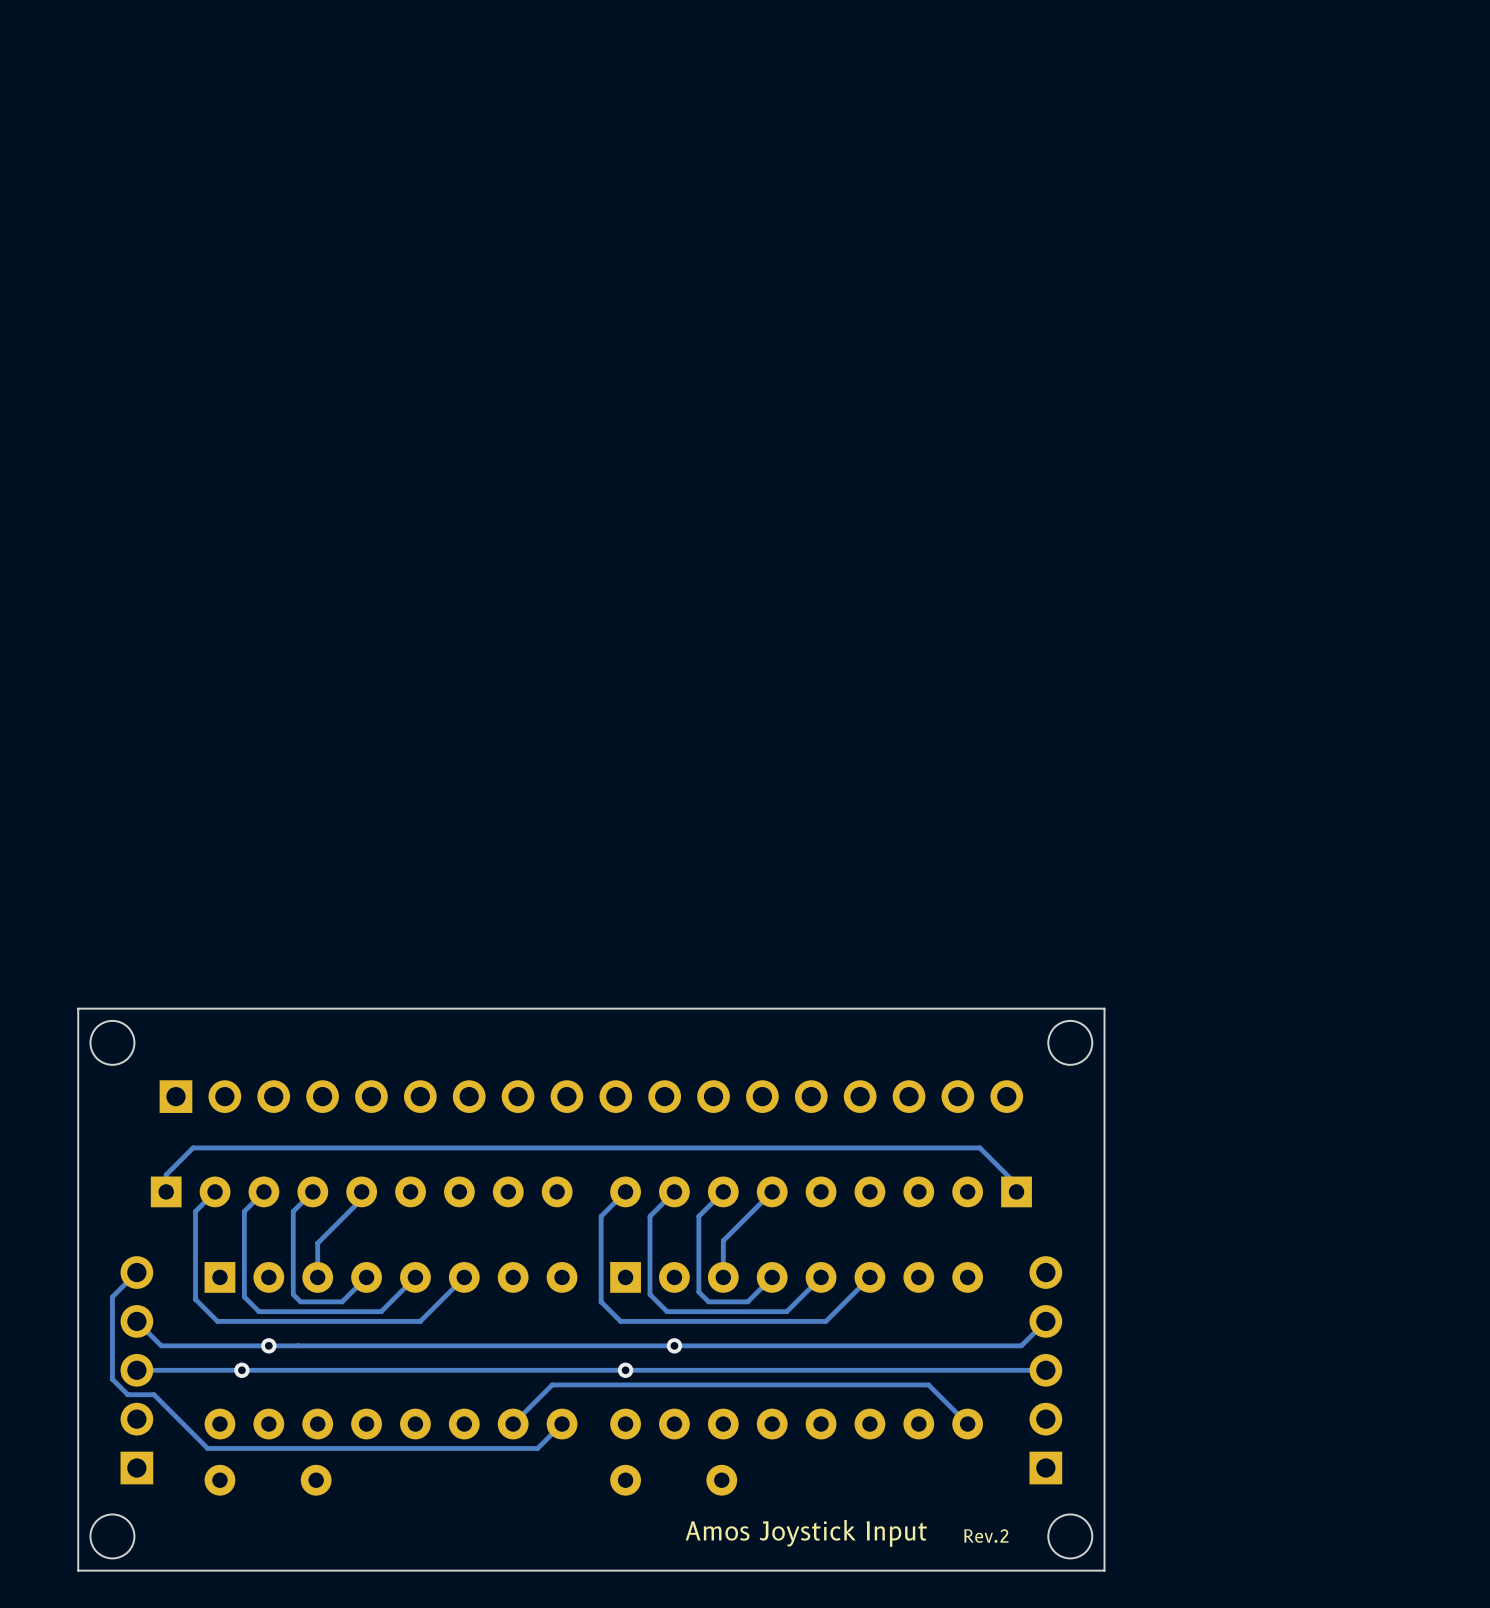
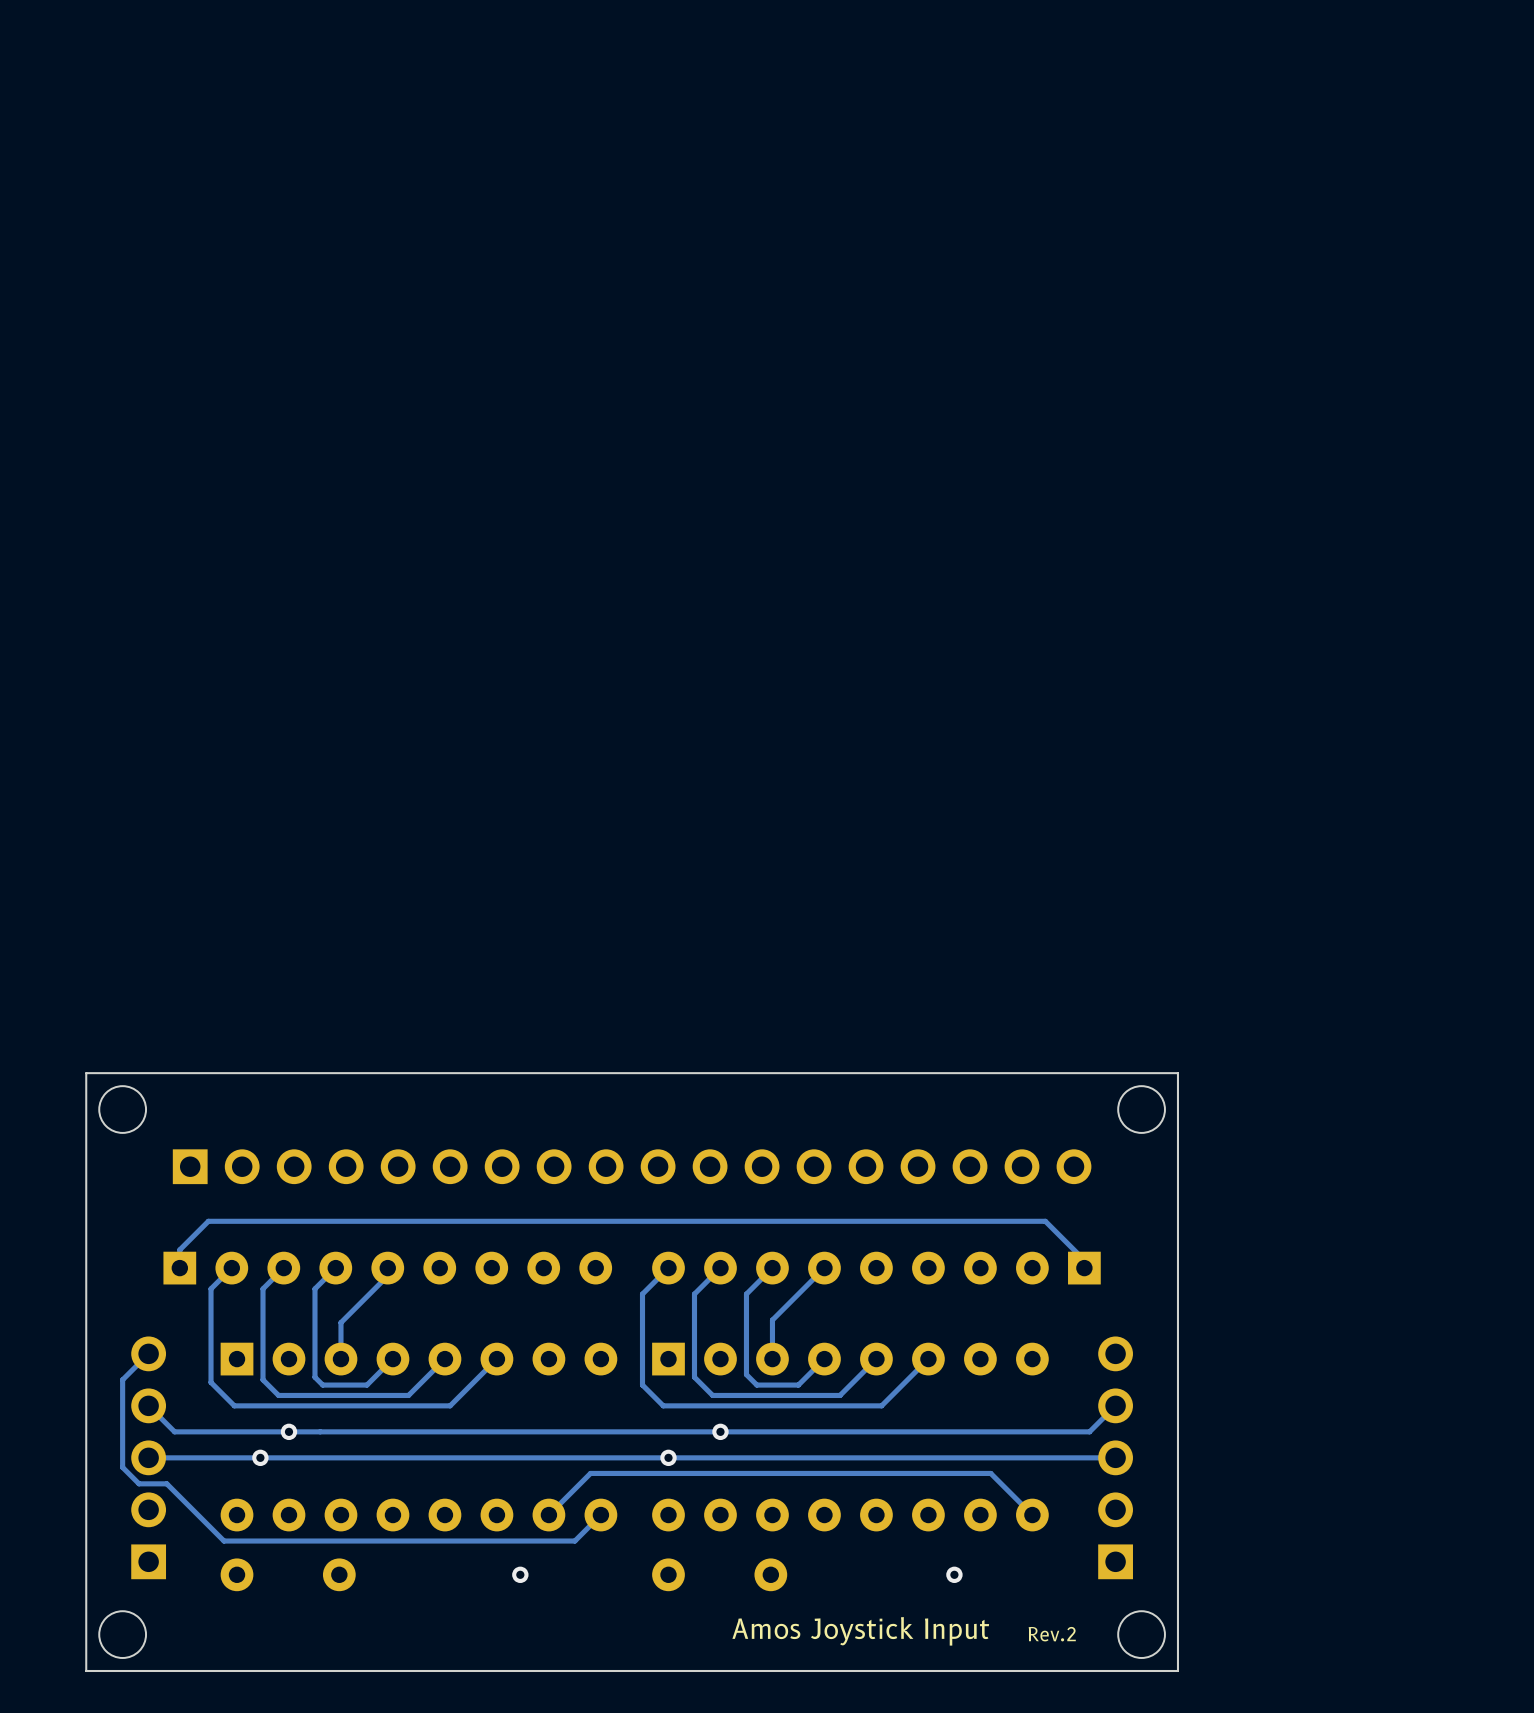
via: none -> (520, 1574)
via: none -> (954, 1574)

